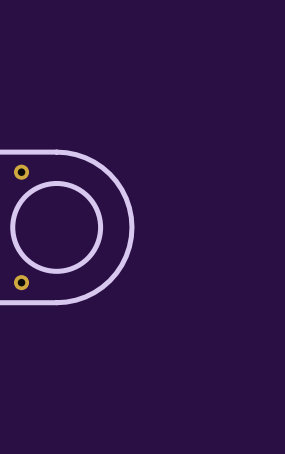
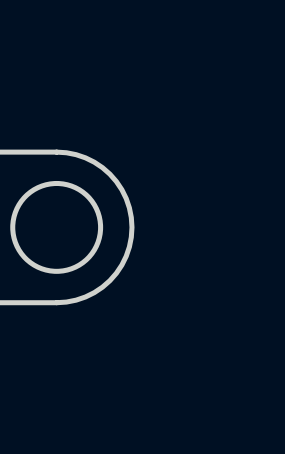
via: (21, 172) -> none
via: (21, 282) -> none

